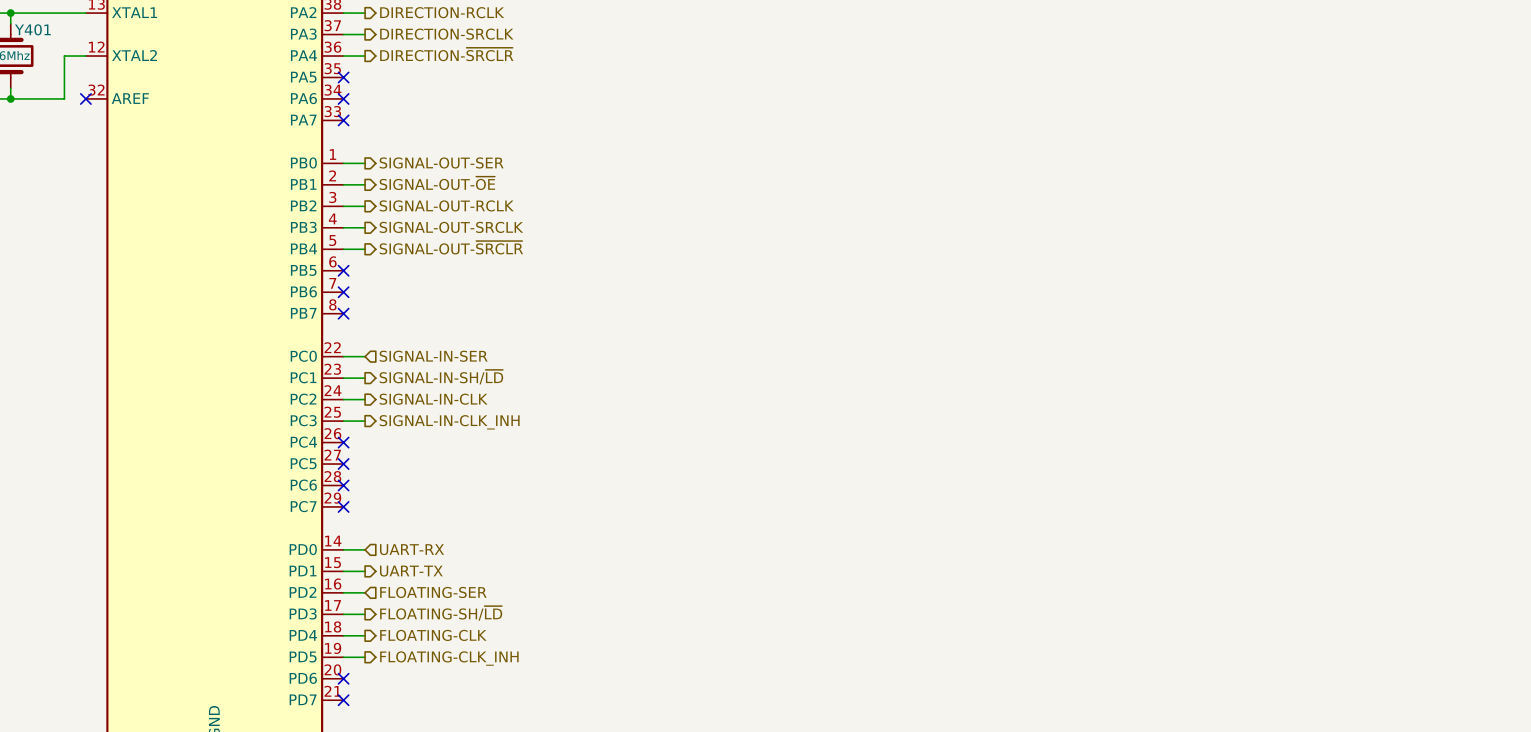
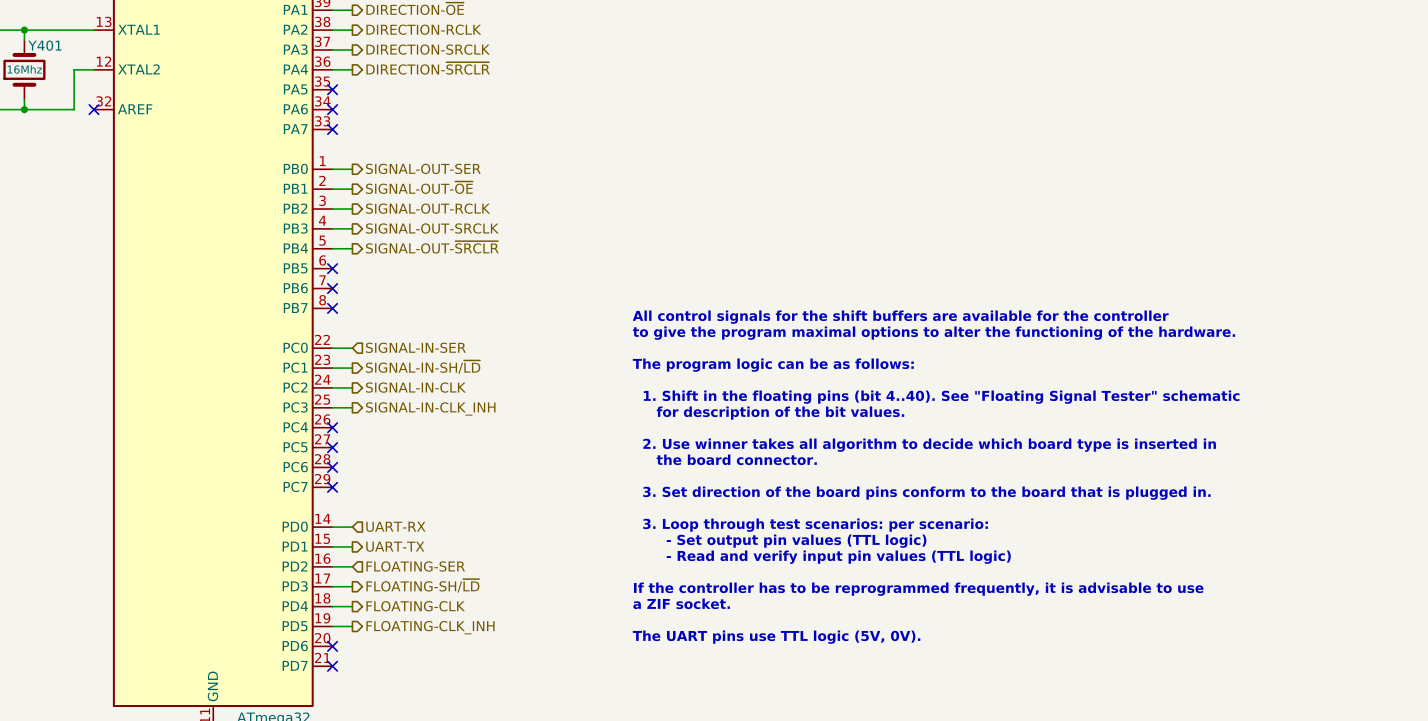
text: none -> All control signals for the shift buffers are available for the controller (900, 317)
text: none -> to give the program maximal options to alter the functioning of the hardware. (934, 333)
text: none -> The program logic can be as follows: (773, 365)
text: none -> 1. Shift in the floating pins (bit 4..40). See "Floating Signal Tester" schematic (941, 397)
text: none -> for description of the bit values. (780, 413)
text: none -> 2. Use winner takes all algorithm to decide which board type is inserted in (929, 445)
text: none -> the board connector. (736, 459)
text: none -> 3. Set direction of the board pins conform to the board that is plugged in. (926, 493)
text: none -> 3. Loop through test scenarios: per scenario: (815, 525)
text: none -> - Set output pin values (TTL logic) (796, 541)
text: none -> - Read and verify input pin values (TTL logic) (838, 557)
text: none -> If the controller has to be reprogrammed frequently, it is advisable to use (918, 589)
text: none -> a ZIF socket. (681, 603)
text: none -> The UART pins use TTL logic (5V, 0V). (776, 637)

